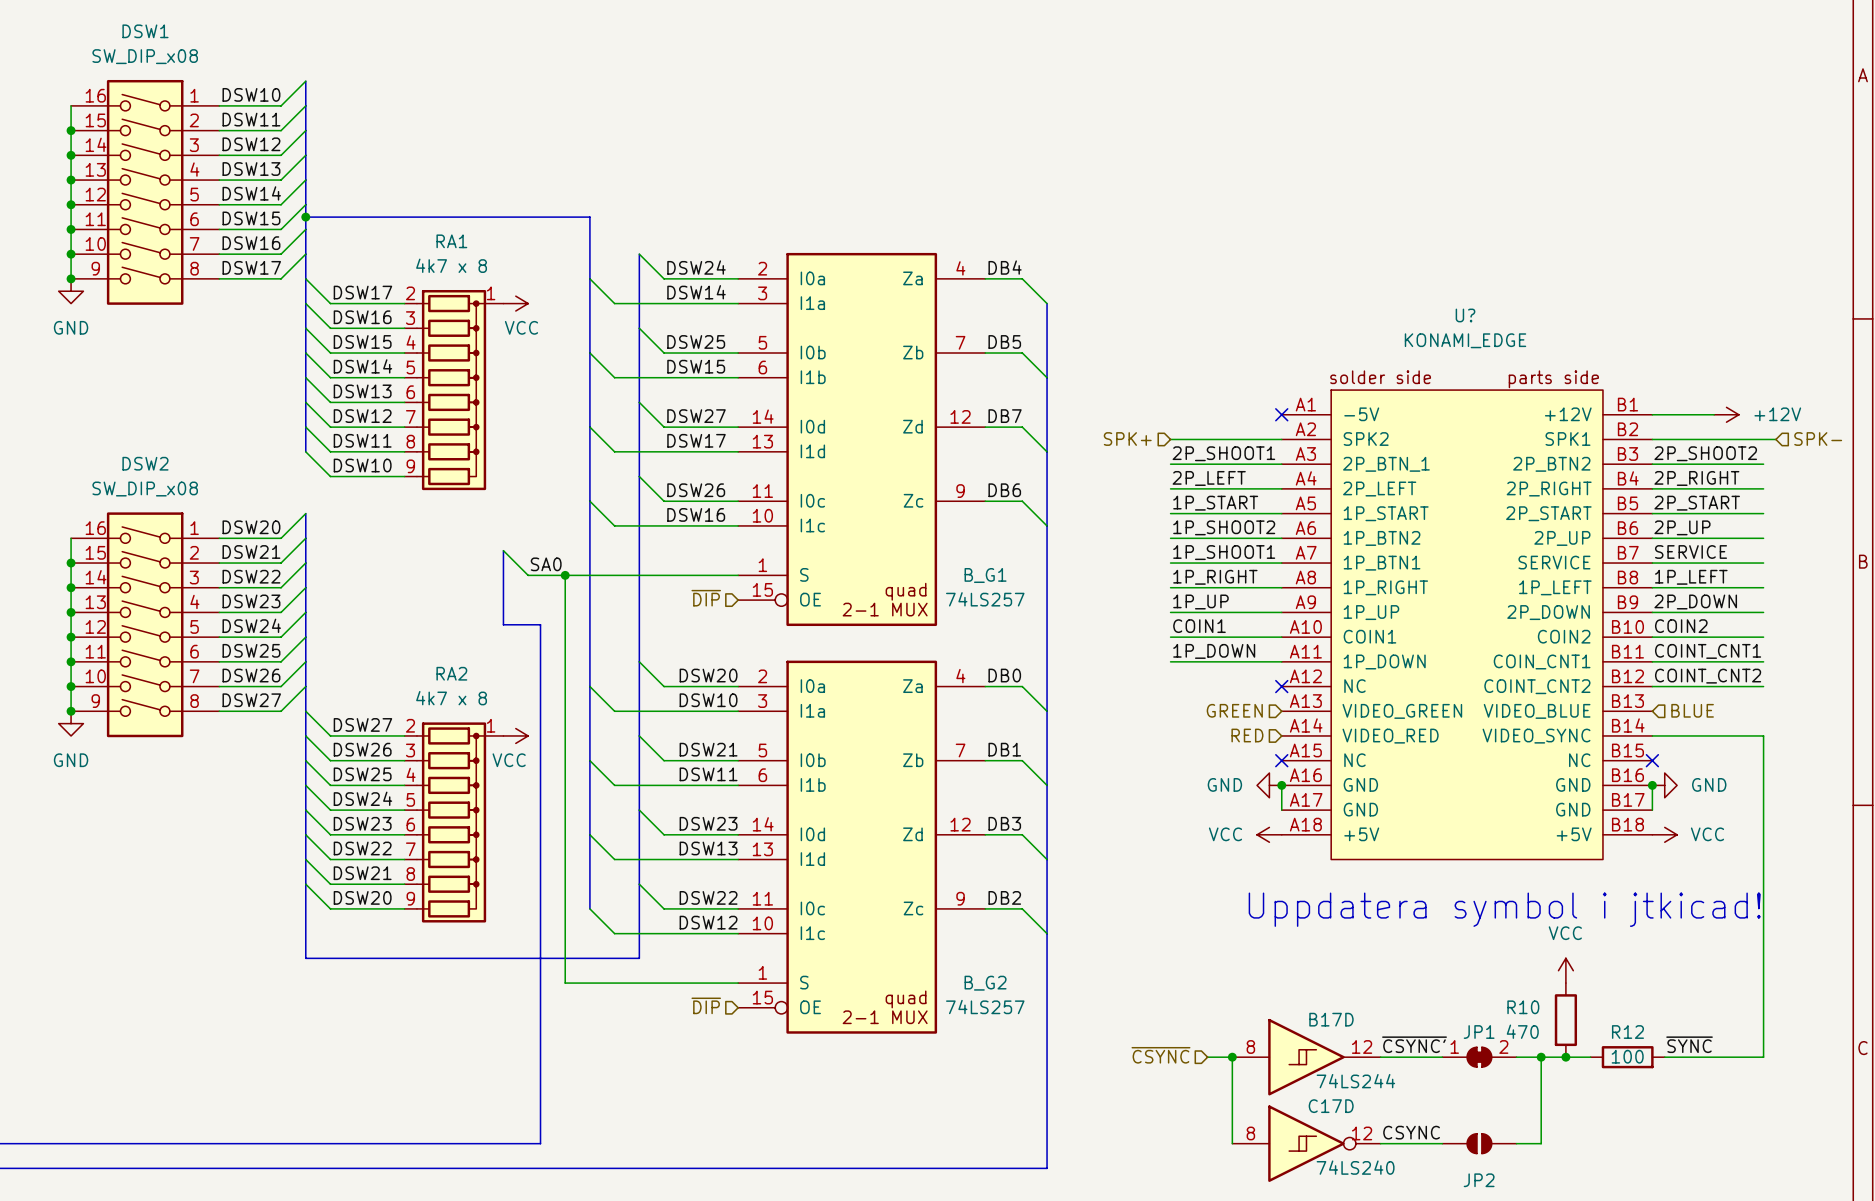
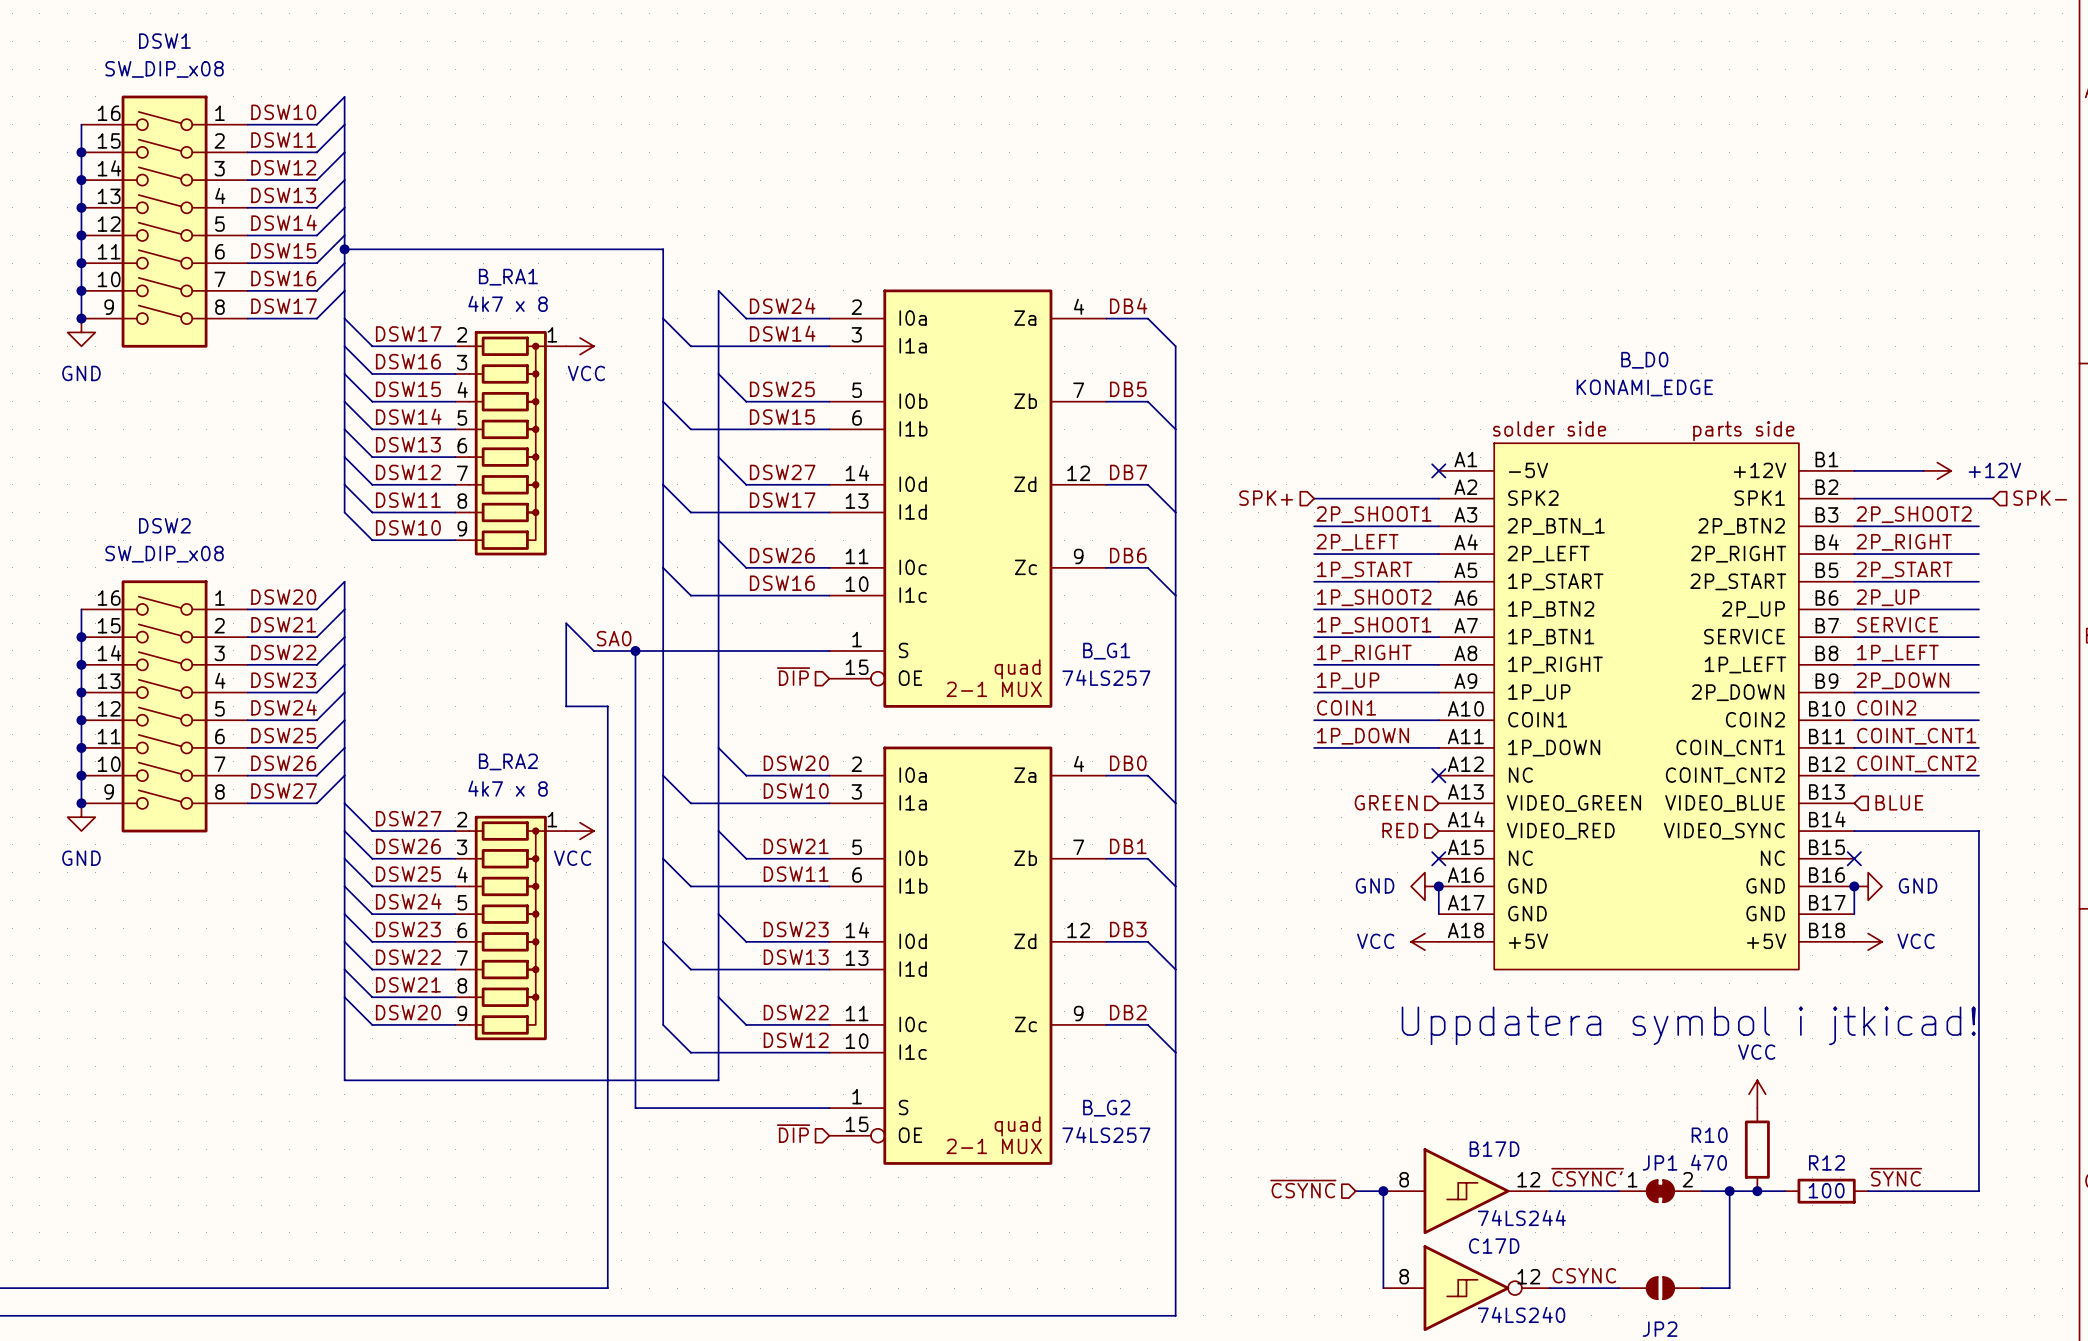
RA1 name: RA1 (451, 241) -> B_RA1 (508, 277)
U? name: U? (1465, 315) -> B_D0 (1644, 360)
RA2 name: RA2 (451, 673) -> B_RA2 (508, 761)

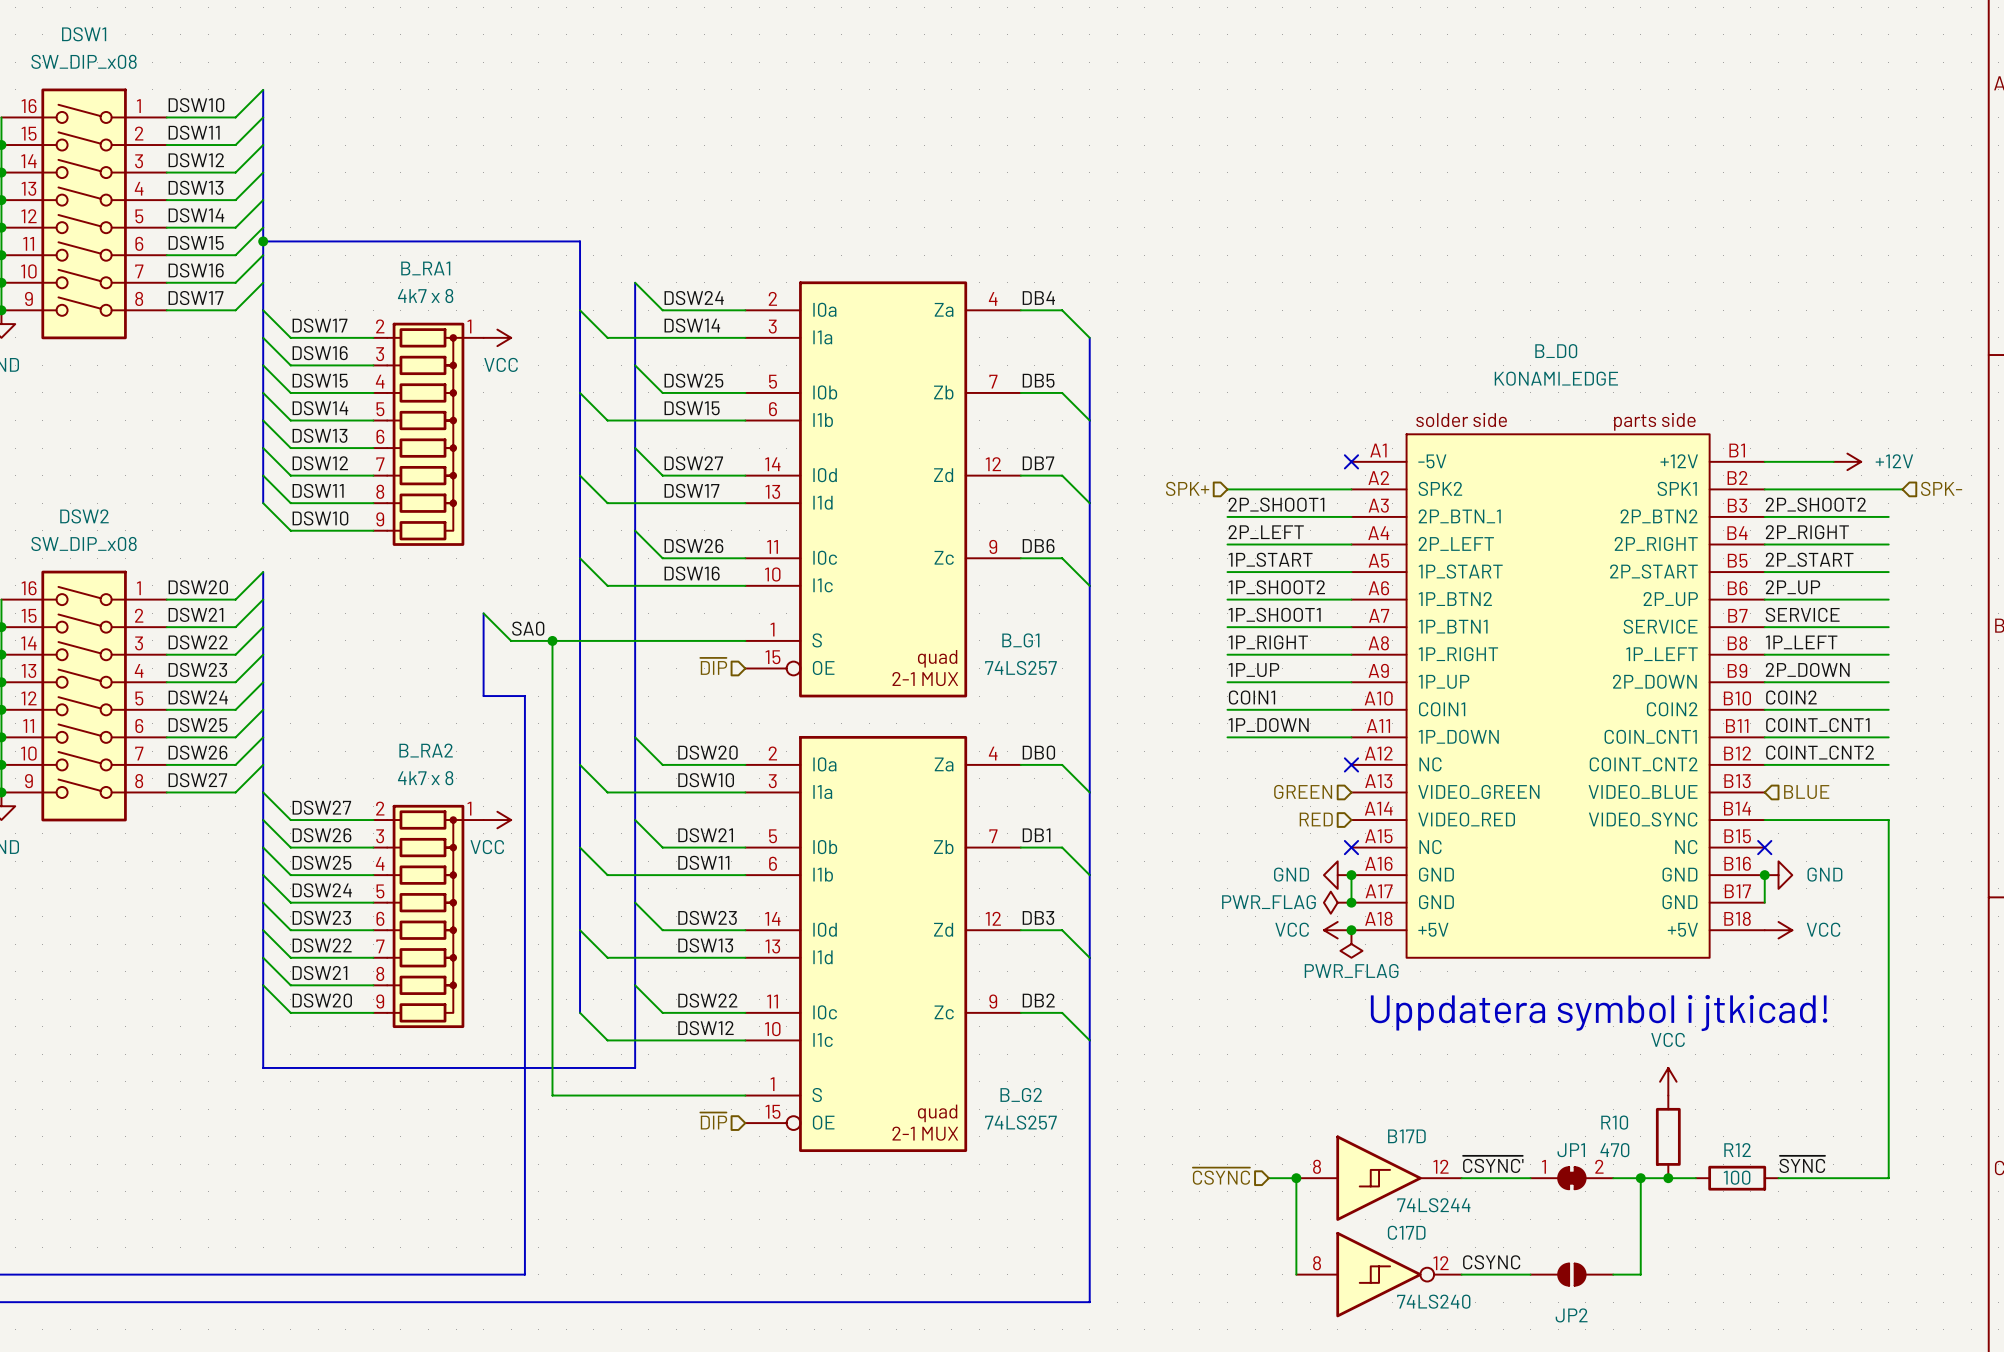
power symbol: none -> PWR_FLAG (1337, 902)
junction: none -> (1351, 902)
junction: none -> (1351, 930)
power symbol: none -> PWR_FLAG (1351, 944)

